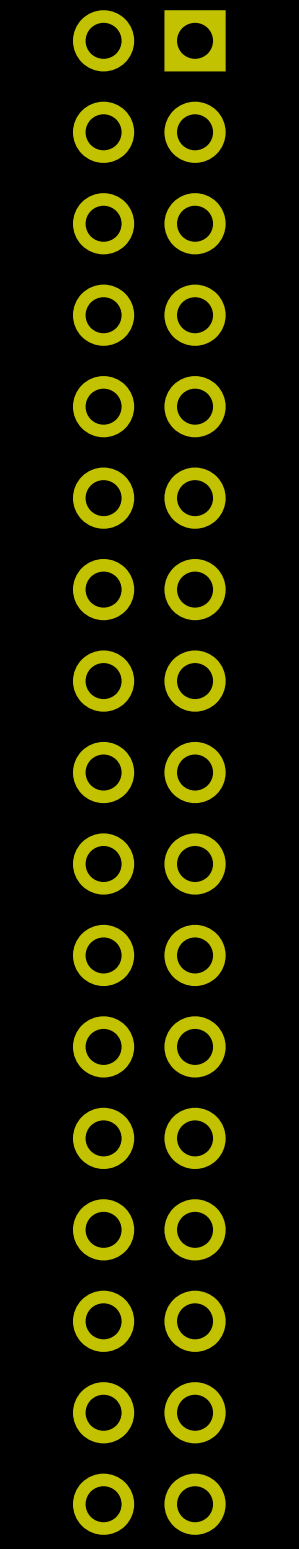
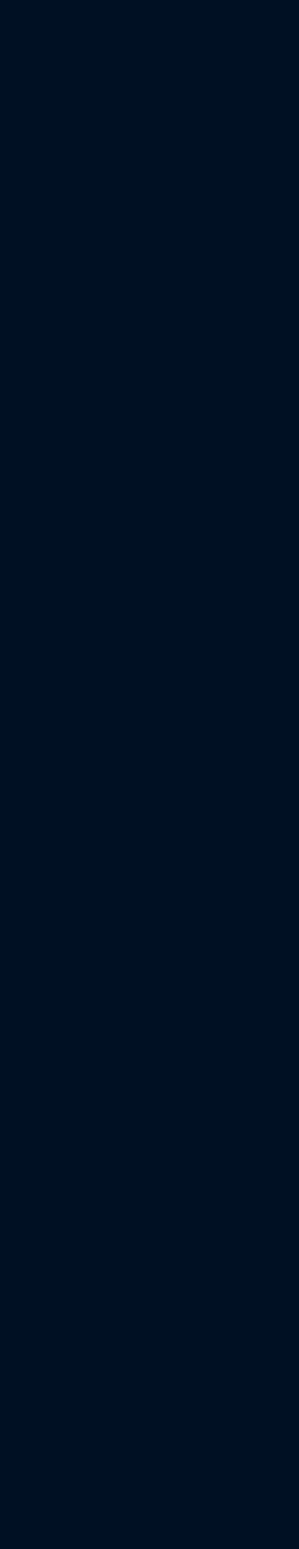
part: (149, 772) -> none

